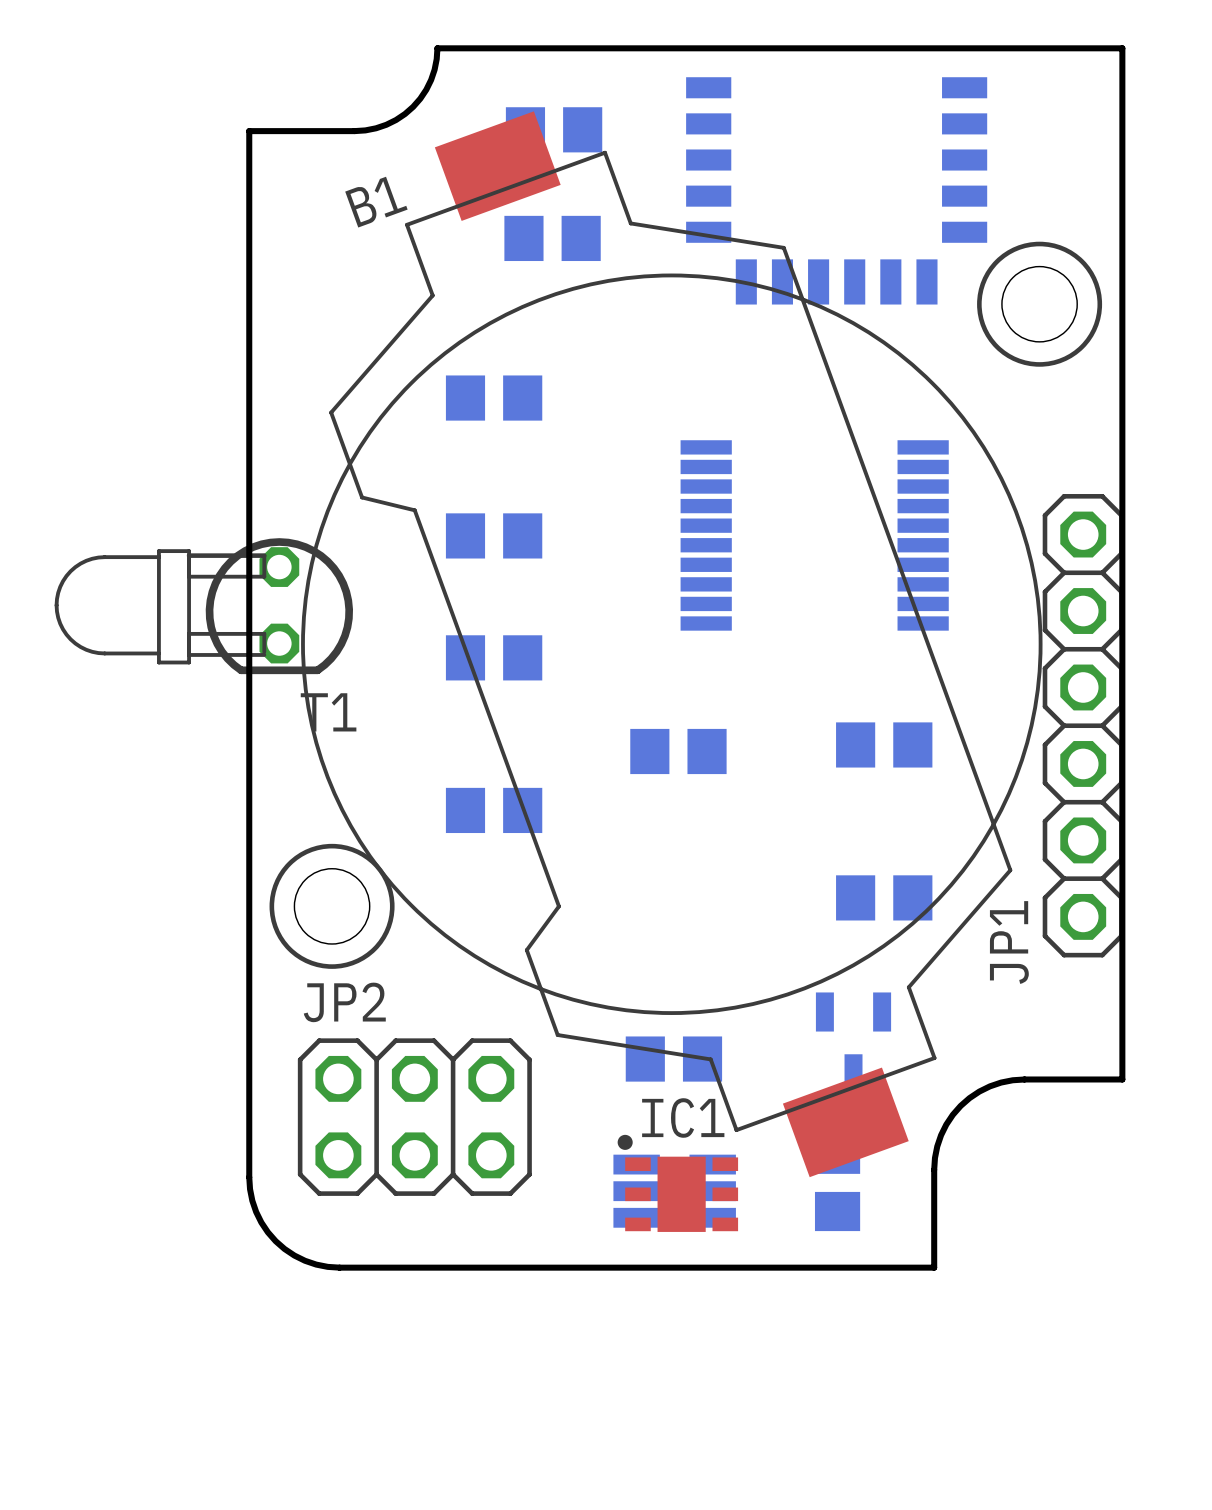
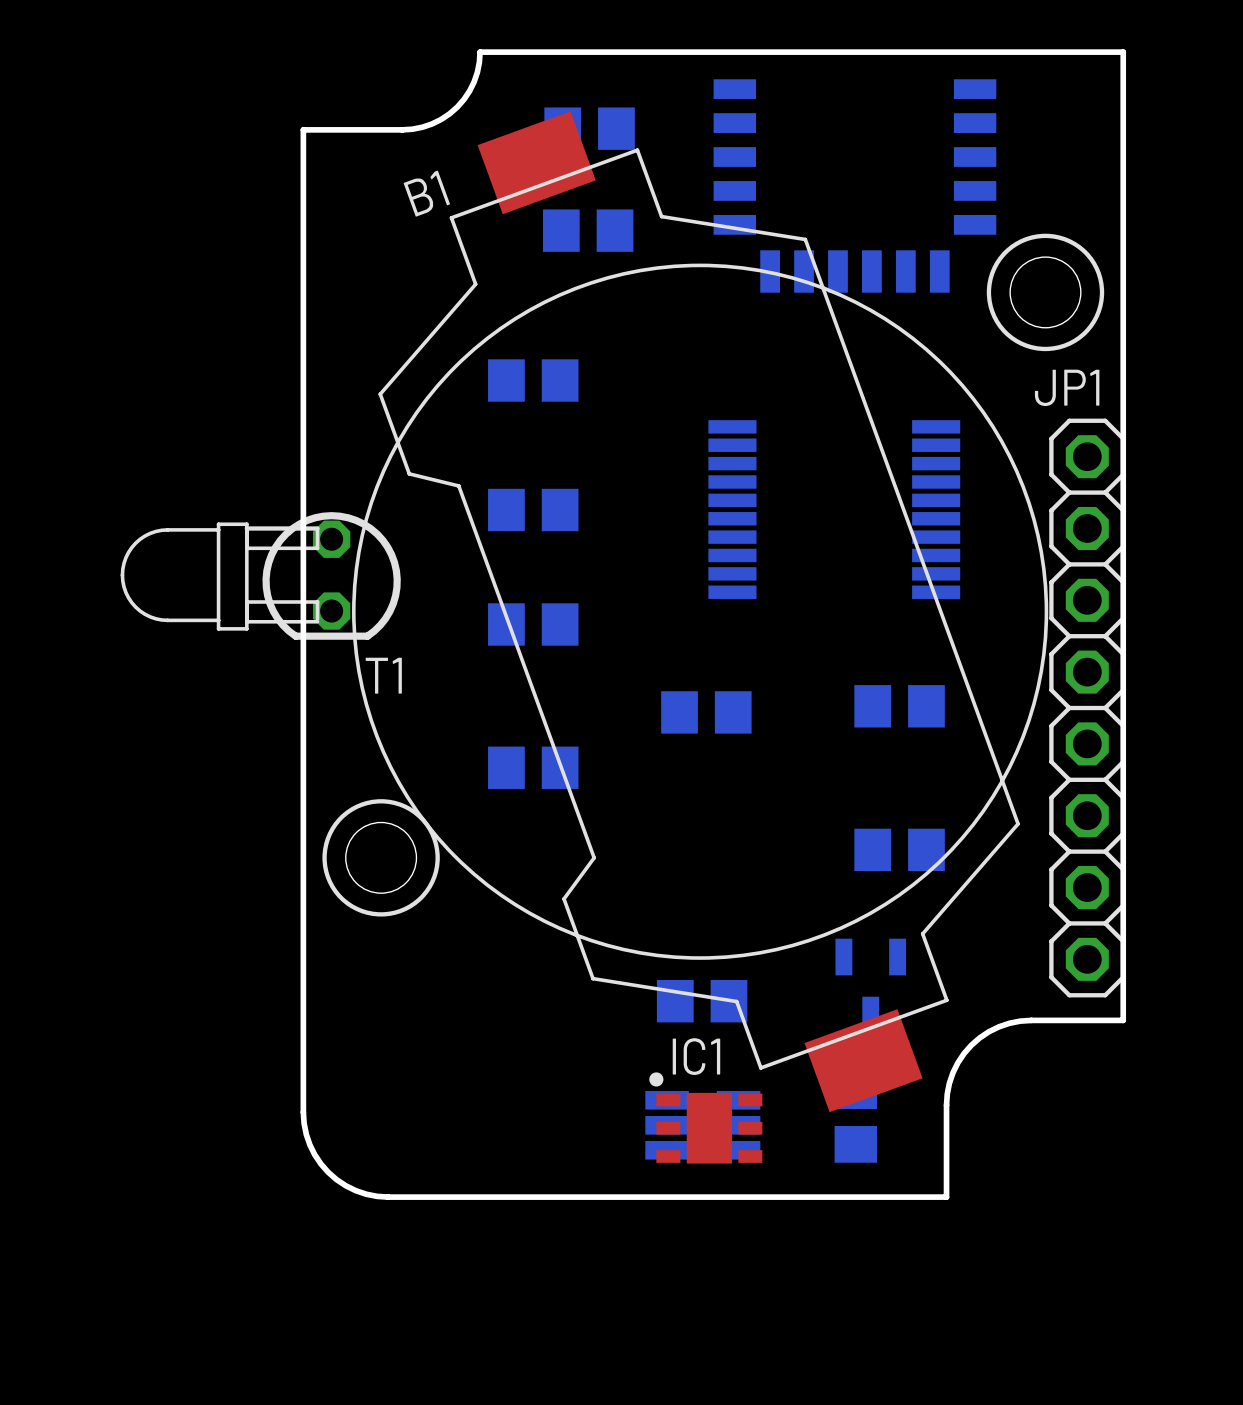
JP1 footprint: [1042, 494, 1124, 958] -> [1049, 418, 1126, 998]
JP1 name position: JP1 (1009, 942) -> JP1 (1067, 387)
JP2: (414, 1117) -> none

